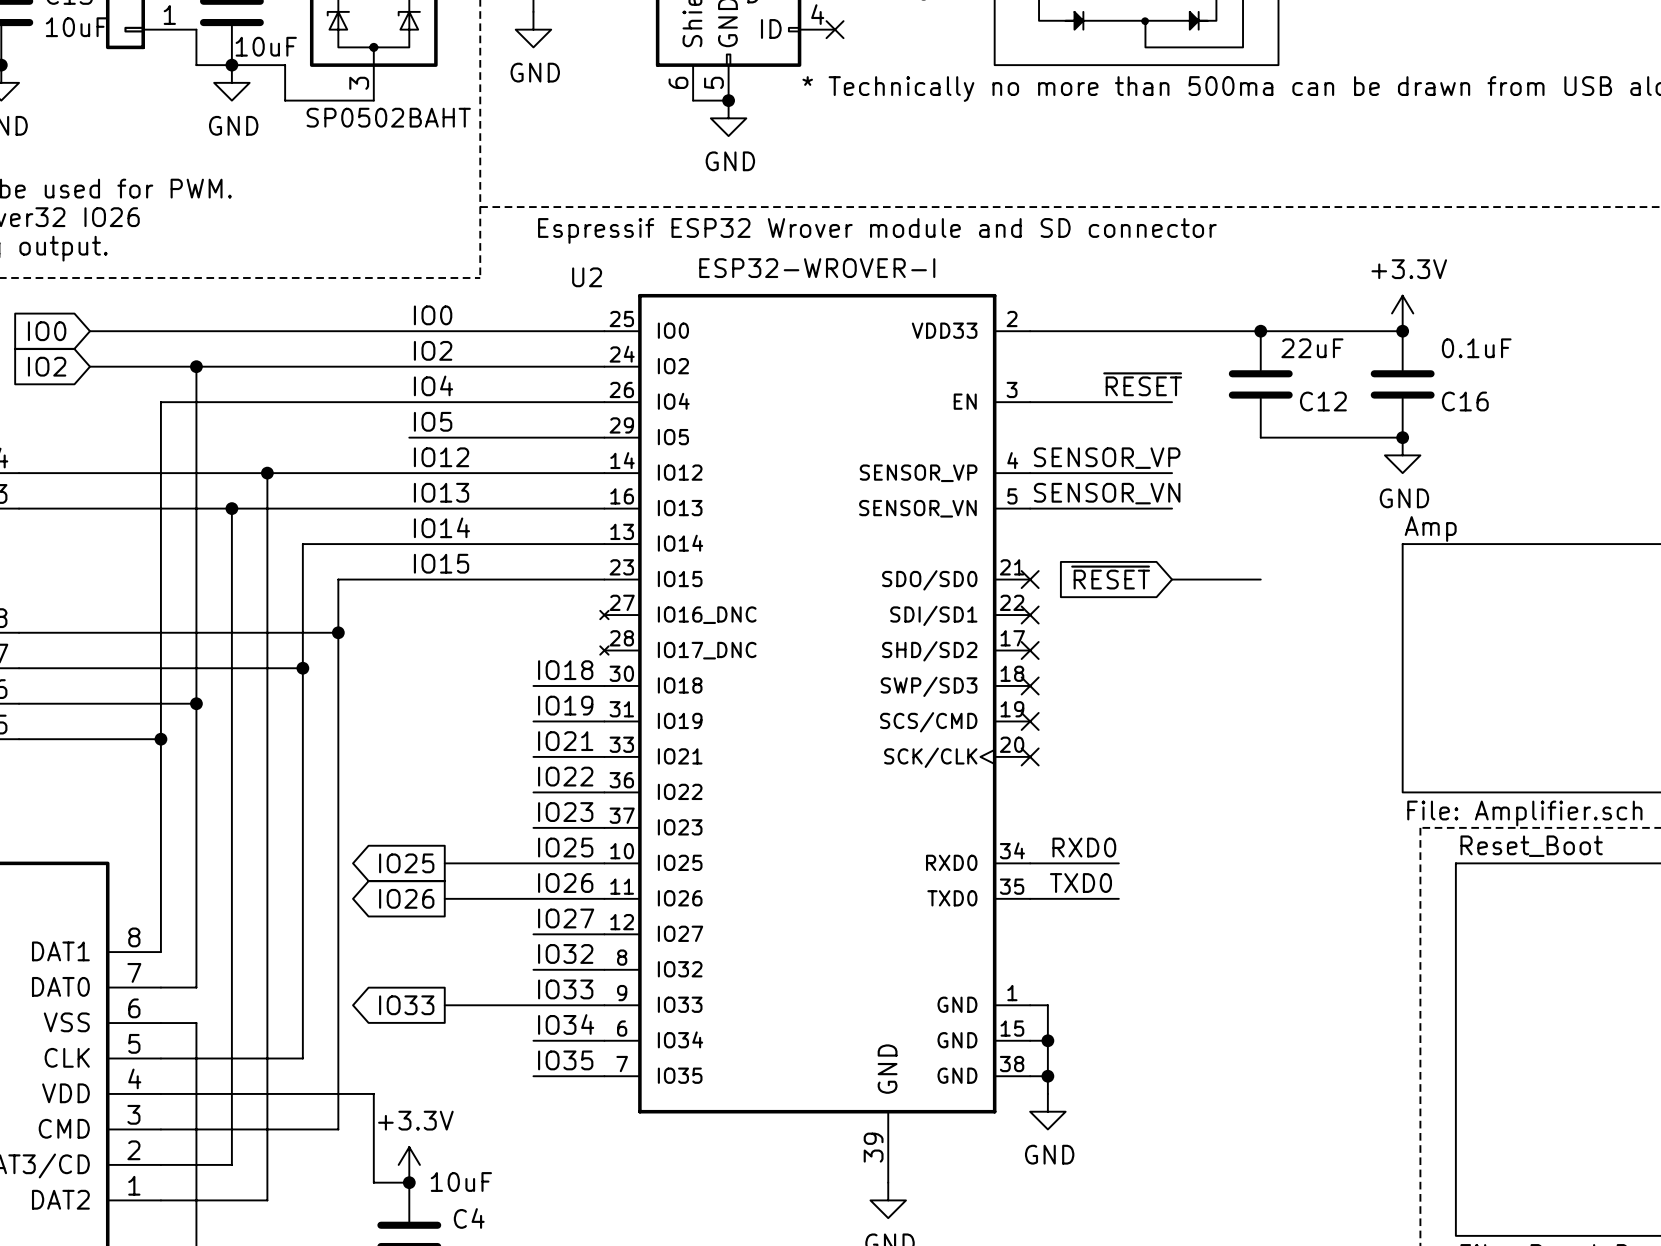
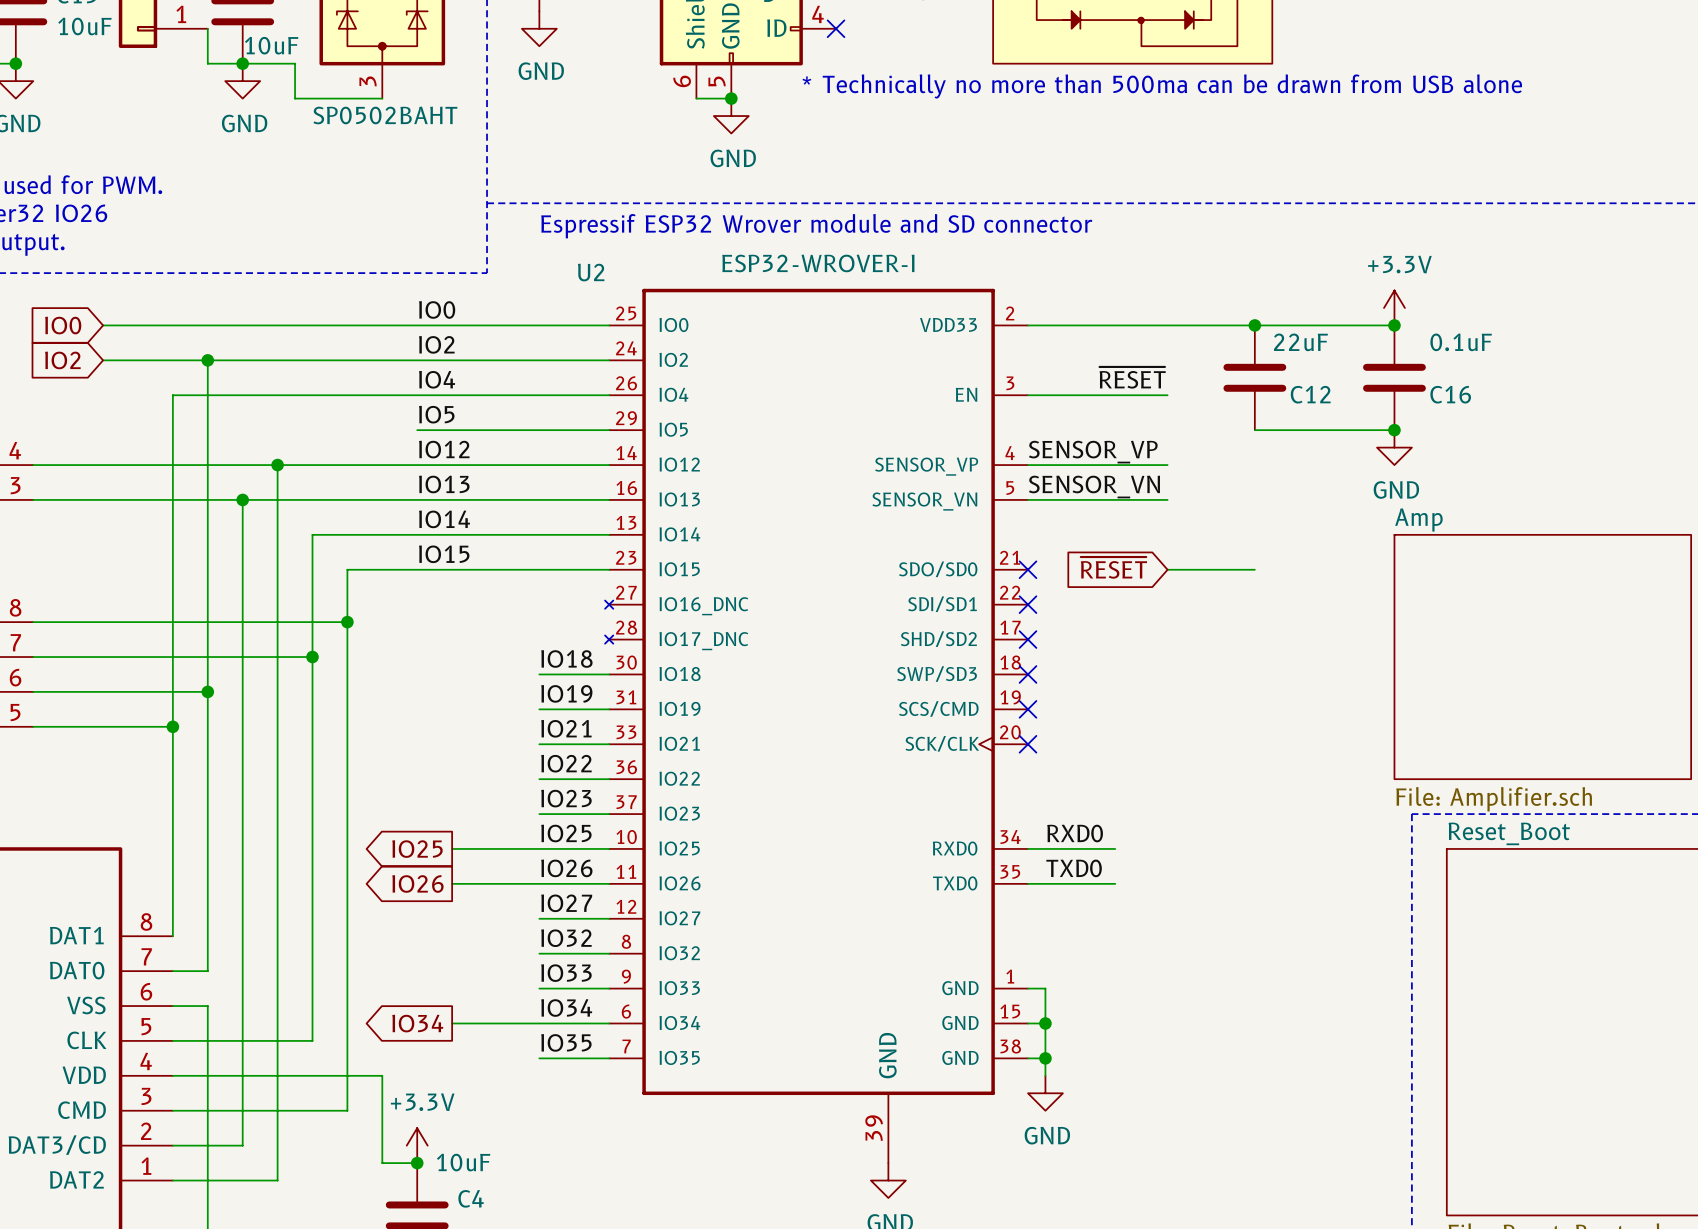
global label: IO33 (406, 1005) -> IO34 (417, 1023)
wire: (444, 1005) (533, 1005) -> (452, 1023) (539, 1023)

